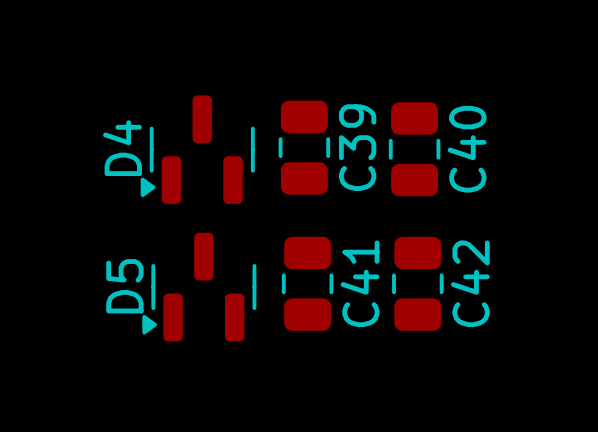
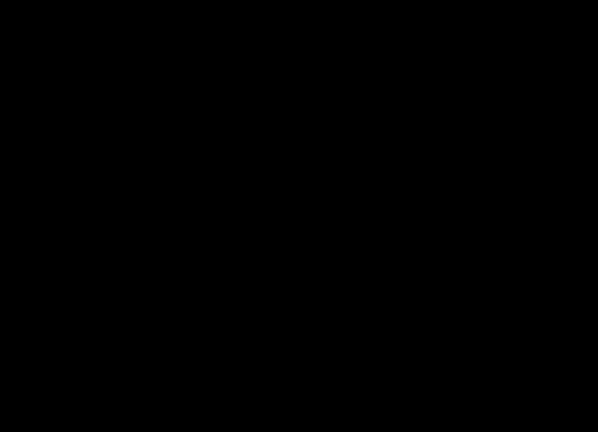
C39: (304, 147) -> none
D4: (197, 149) -> none
C40: (414, 149) -> none
C41: (307, 283) -> none
C42: (417, 283) -> none
D5: (199, 287) -> none

